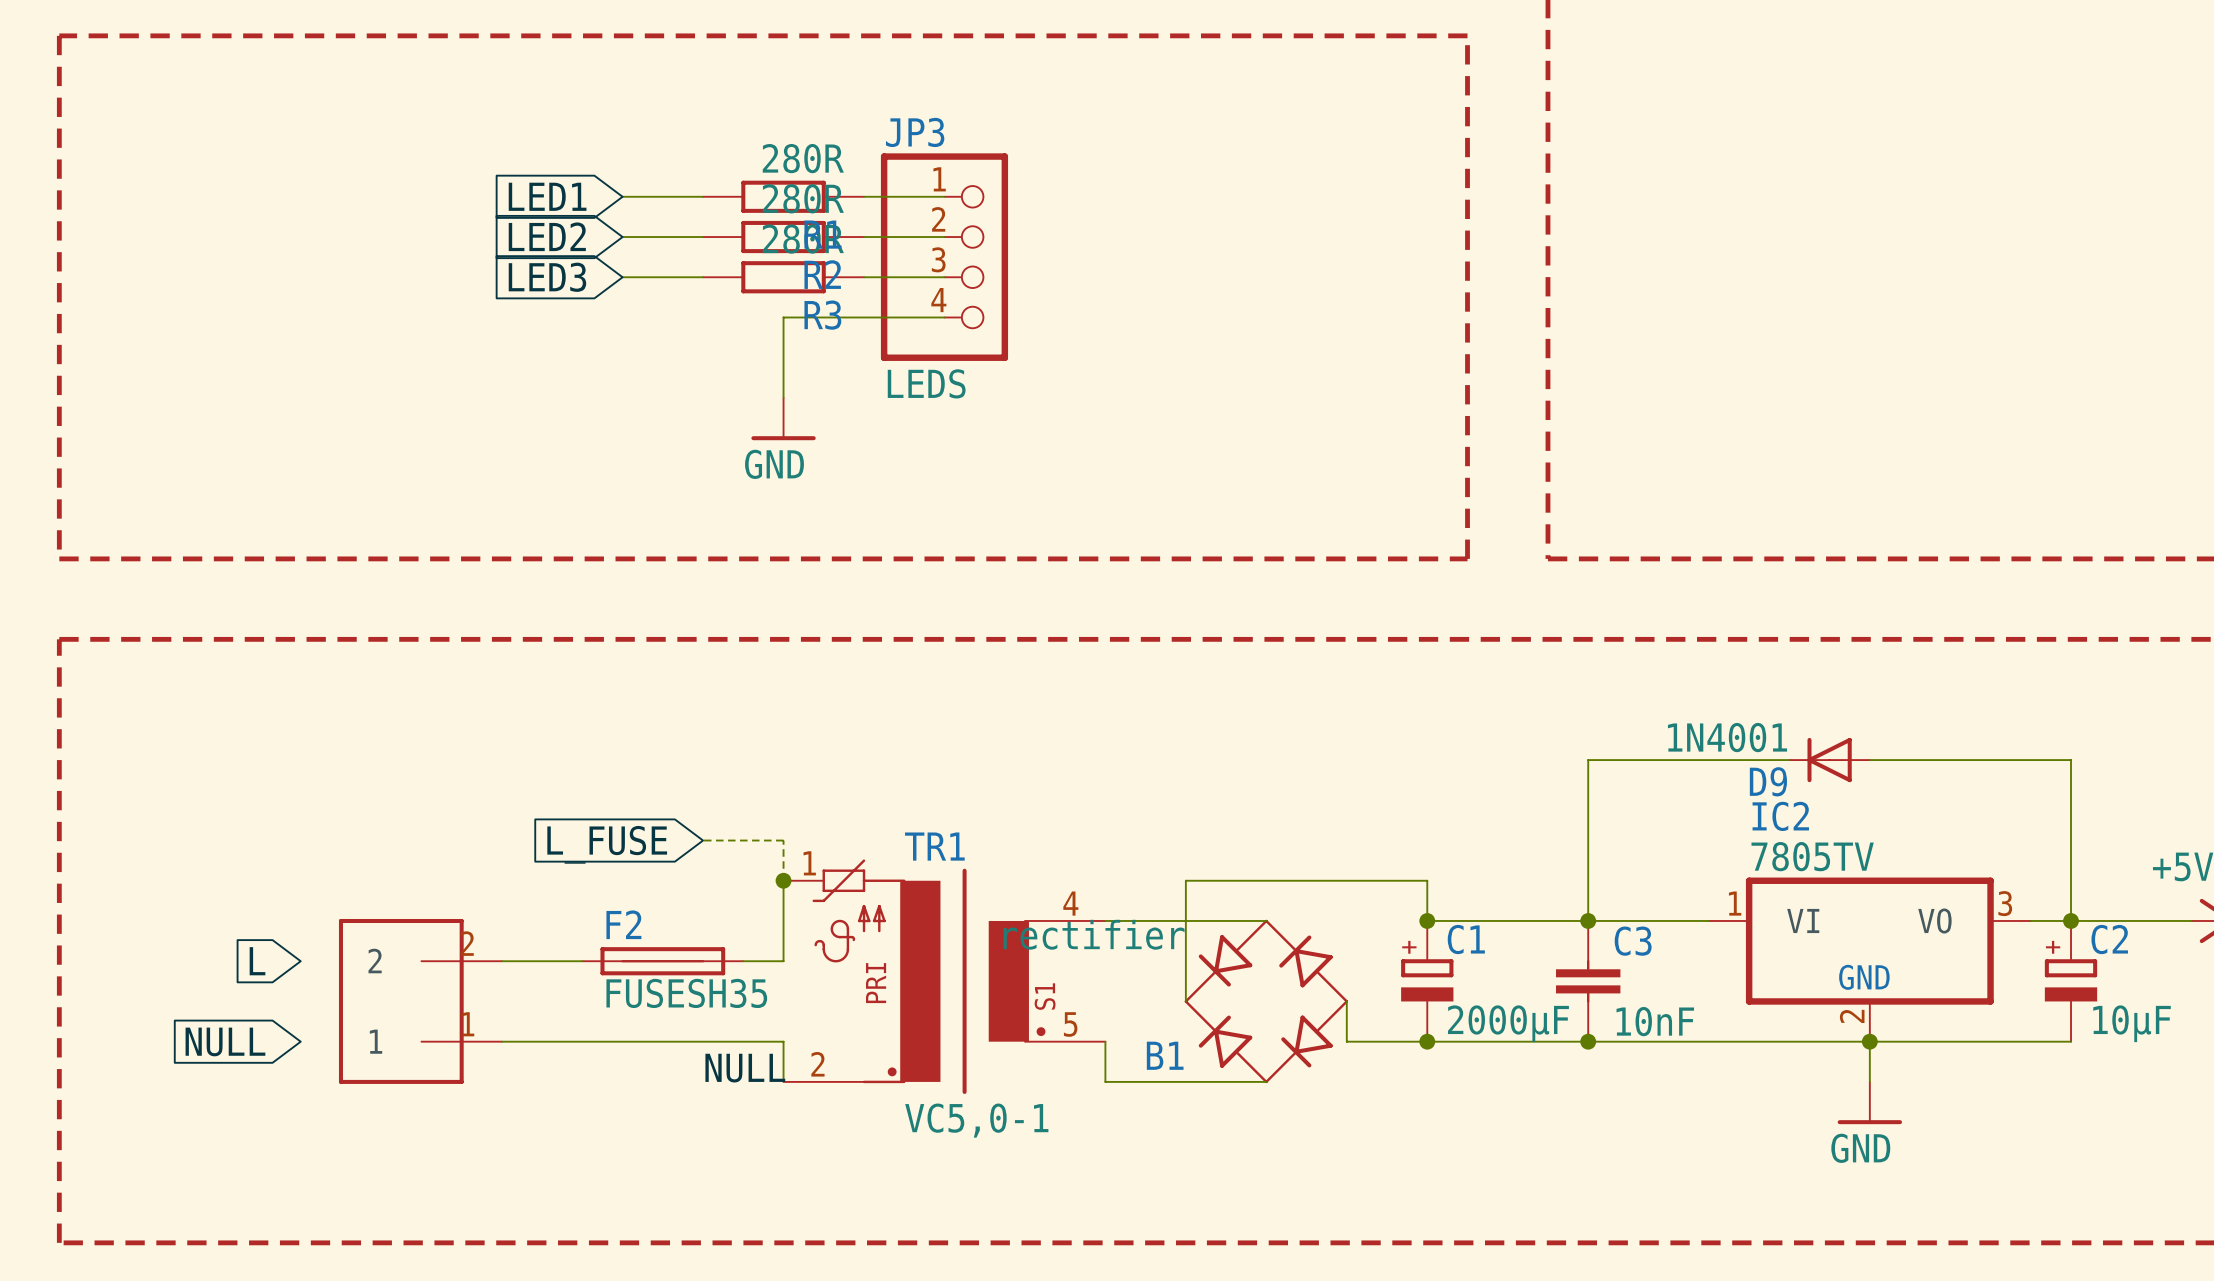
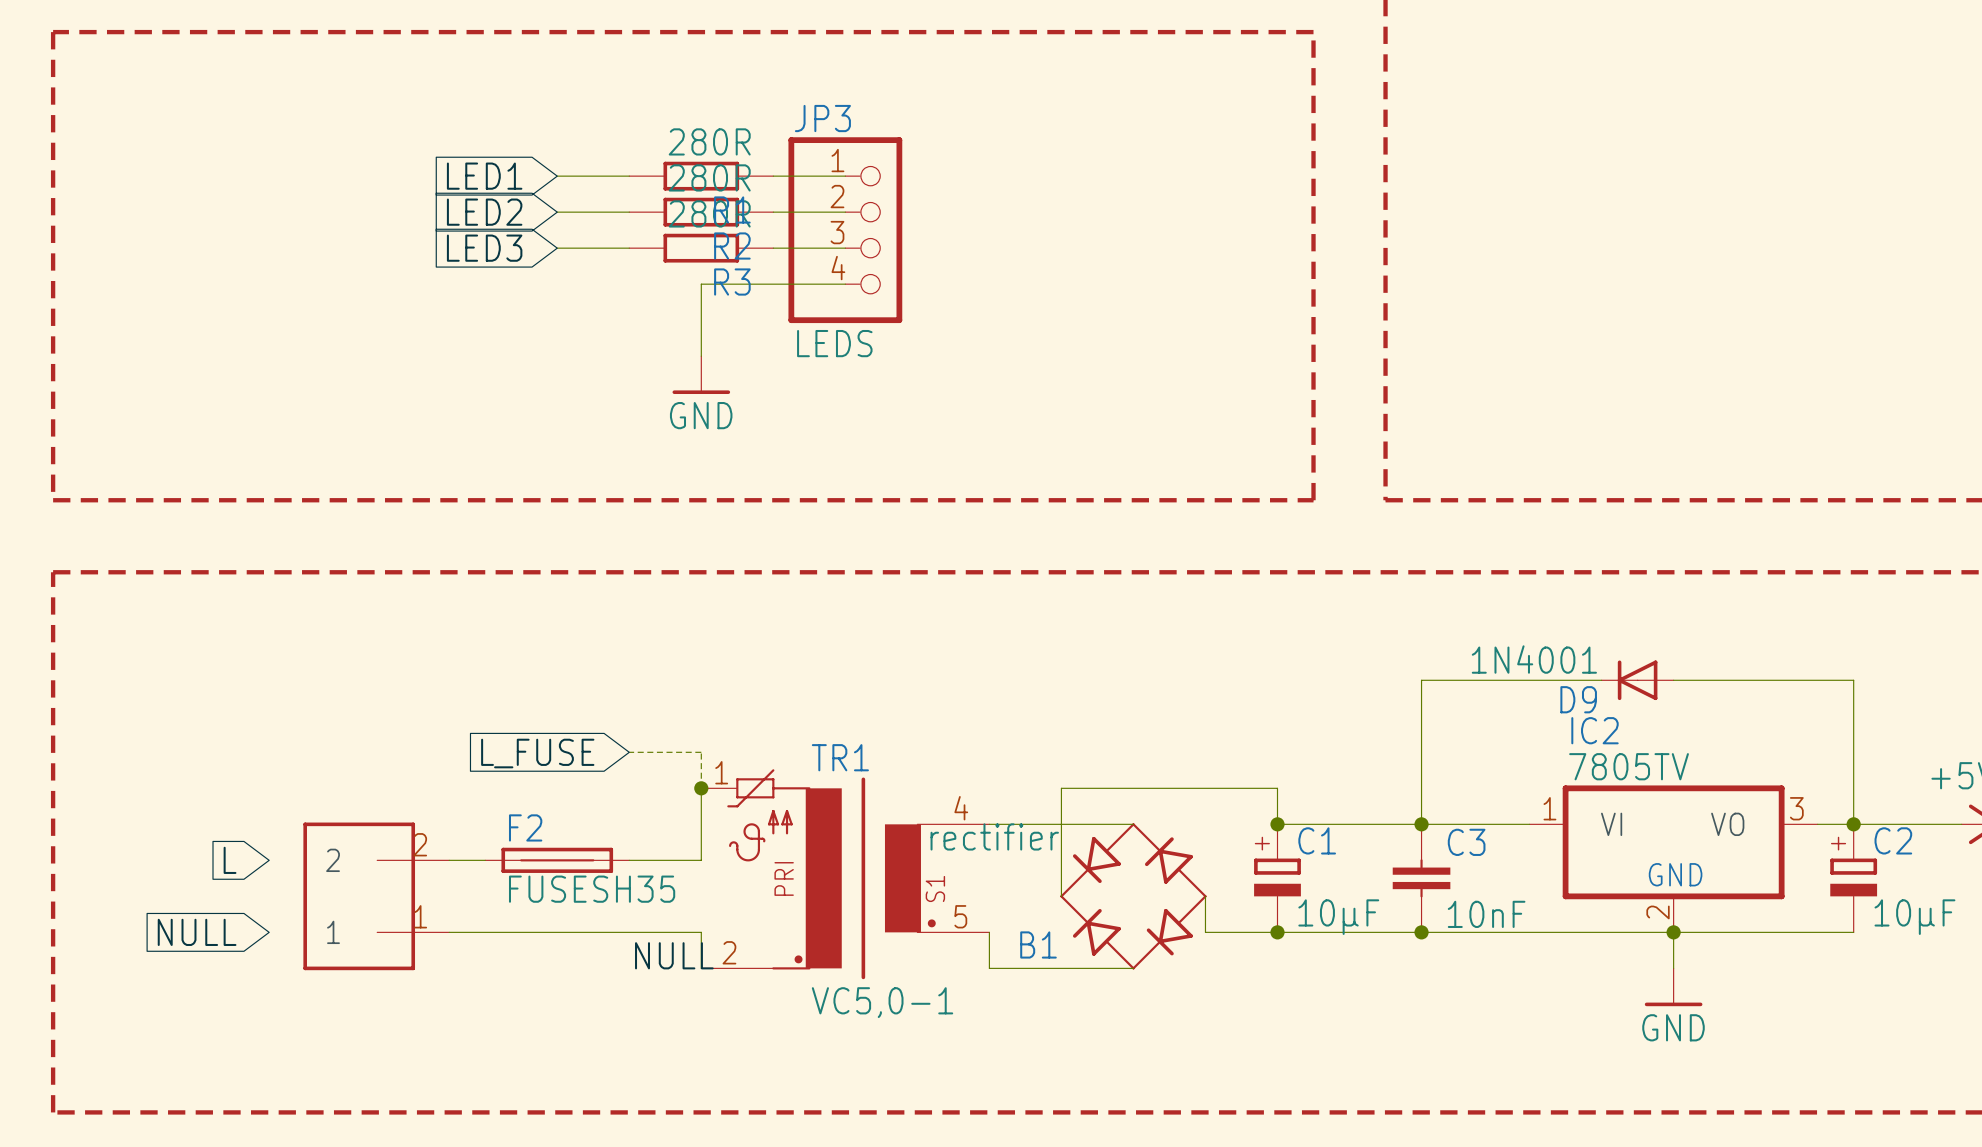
F2 position: (662, 961) -> (557, 860)
C1 value: 2000µF (1508, 1023) -> 10µF (1338, 917)

